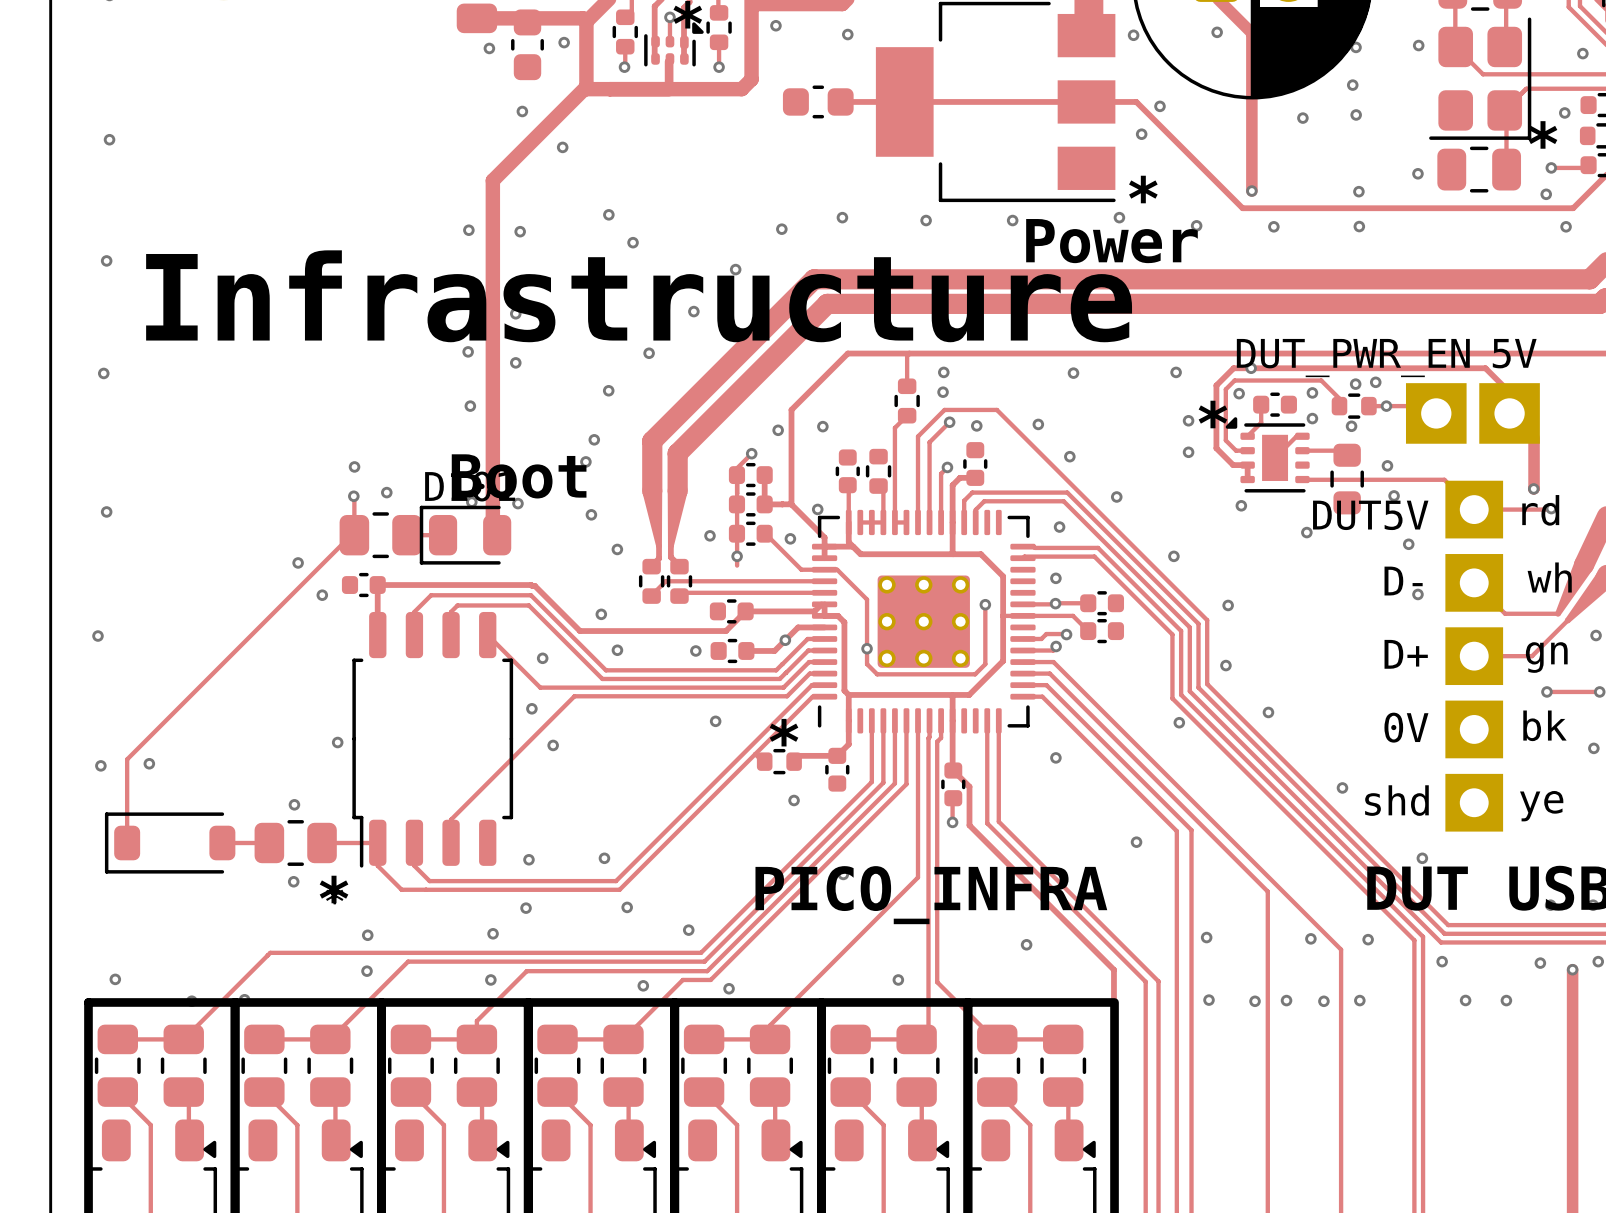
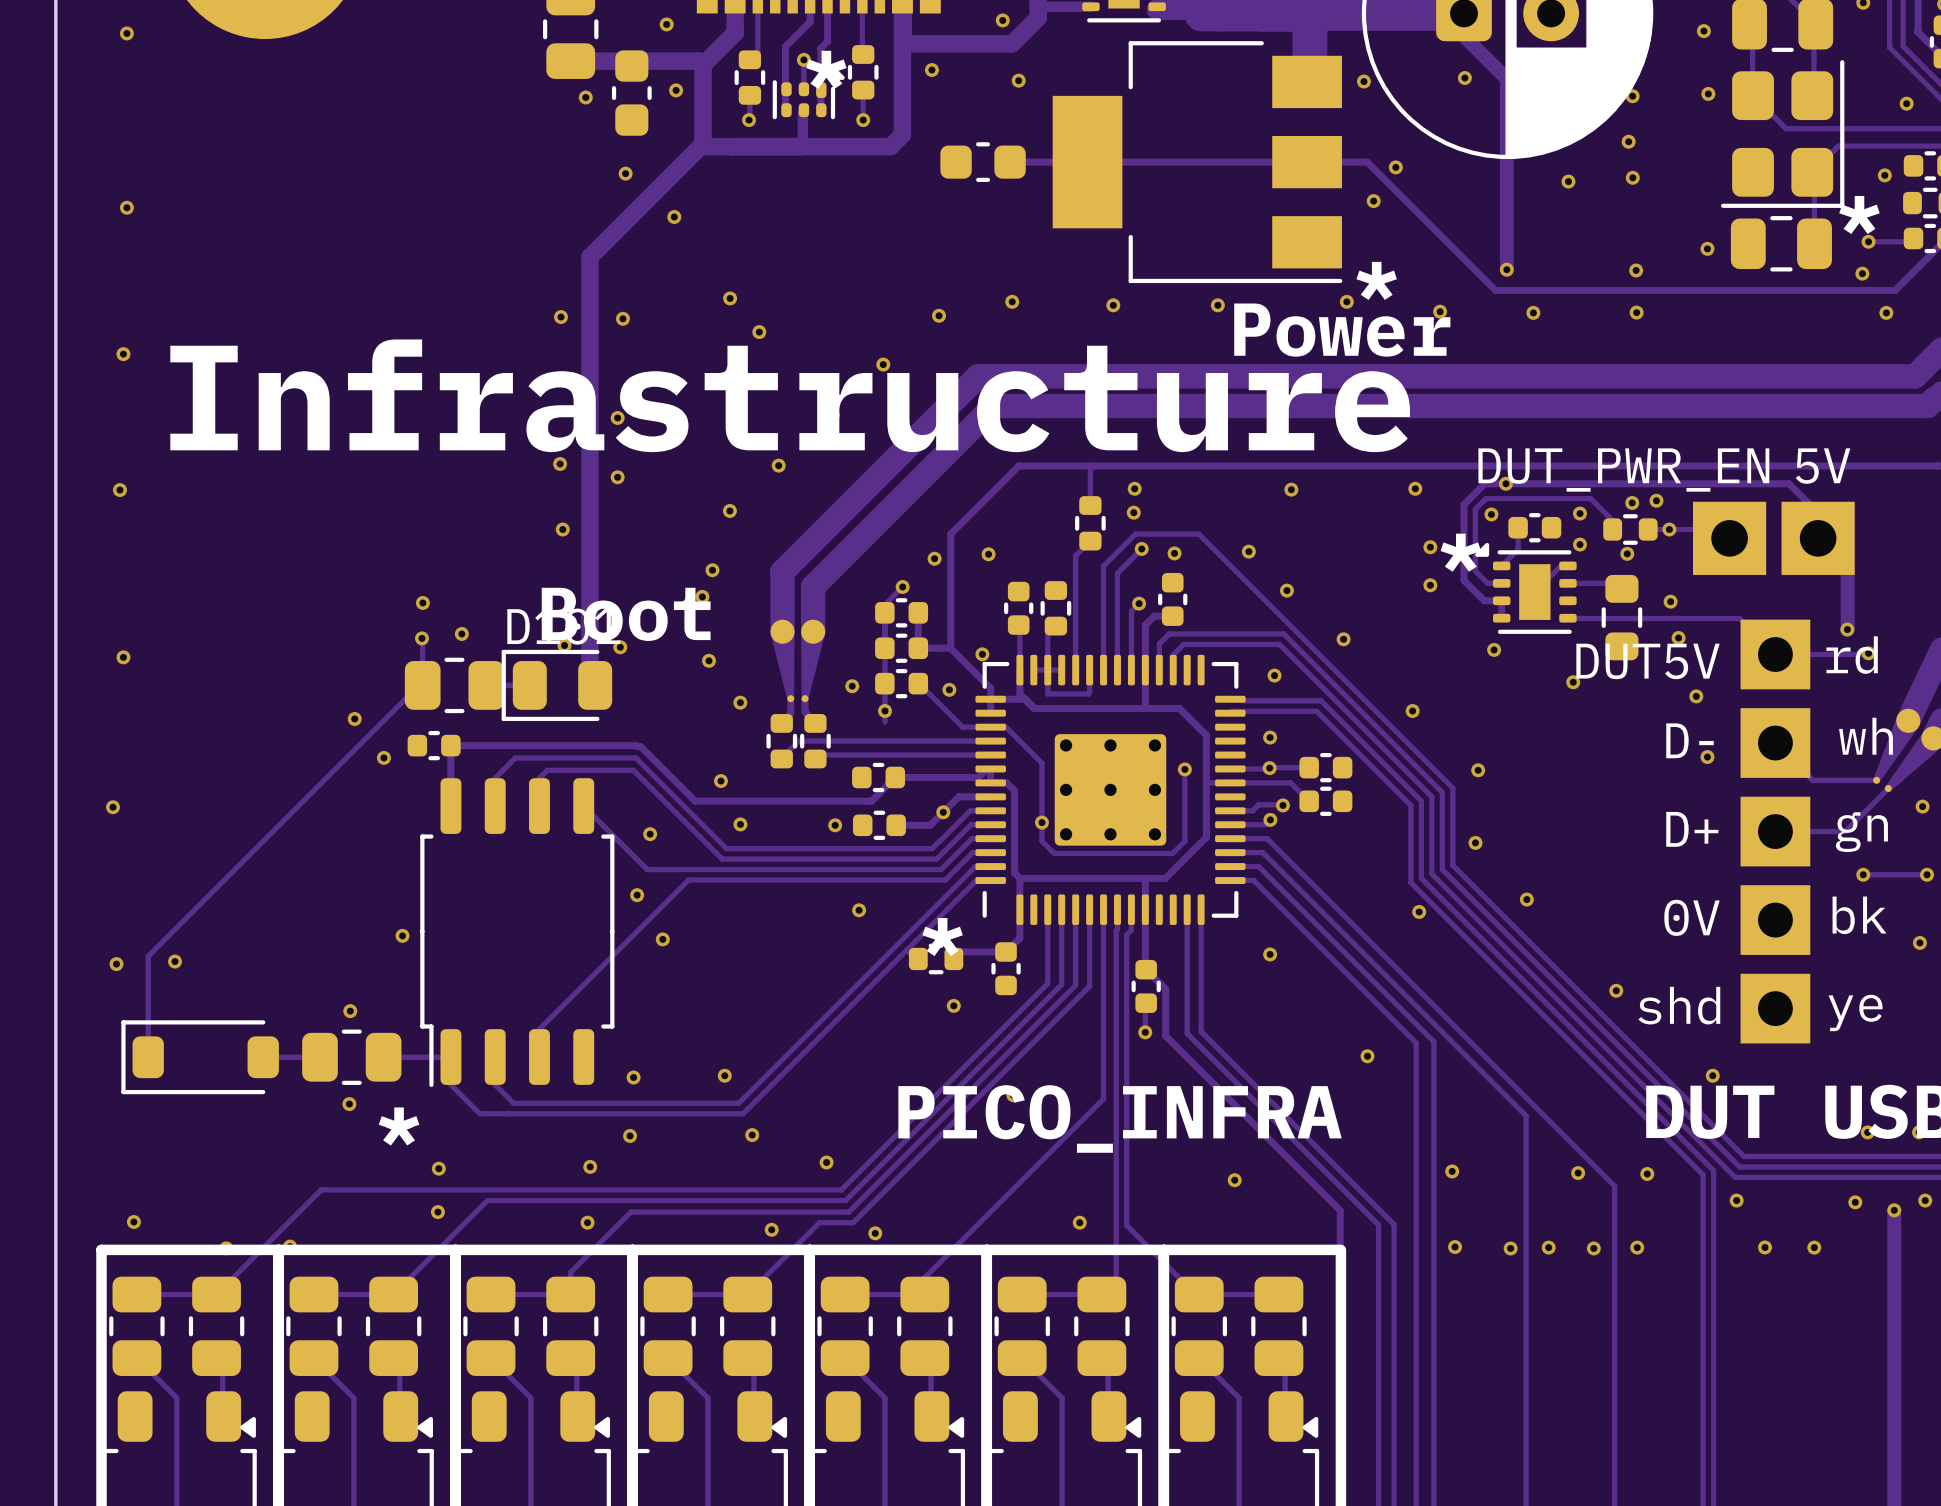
track: (883, 490) (883, 522) -> none
track: (894, 522) (906, 522) -> (1055, 626) (1047, 634) (1047, 693) (1088, 693) (1089, 670)

